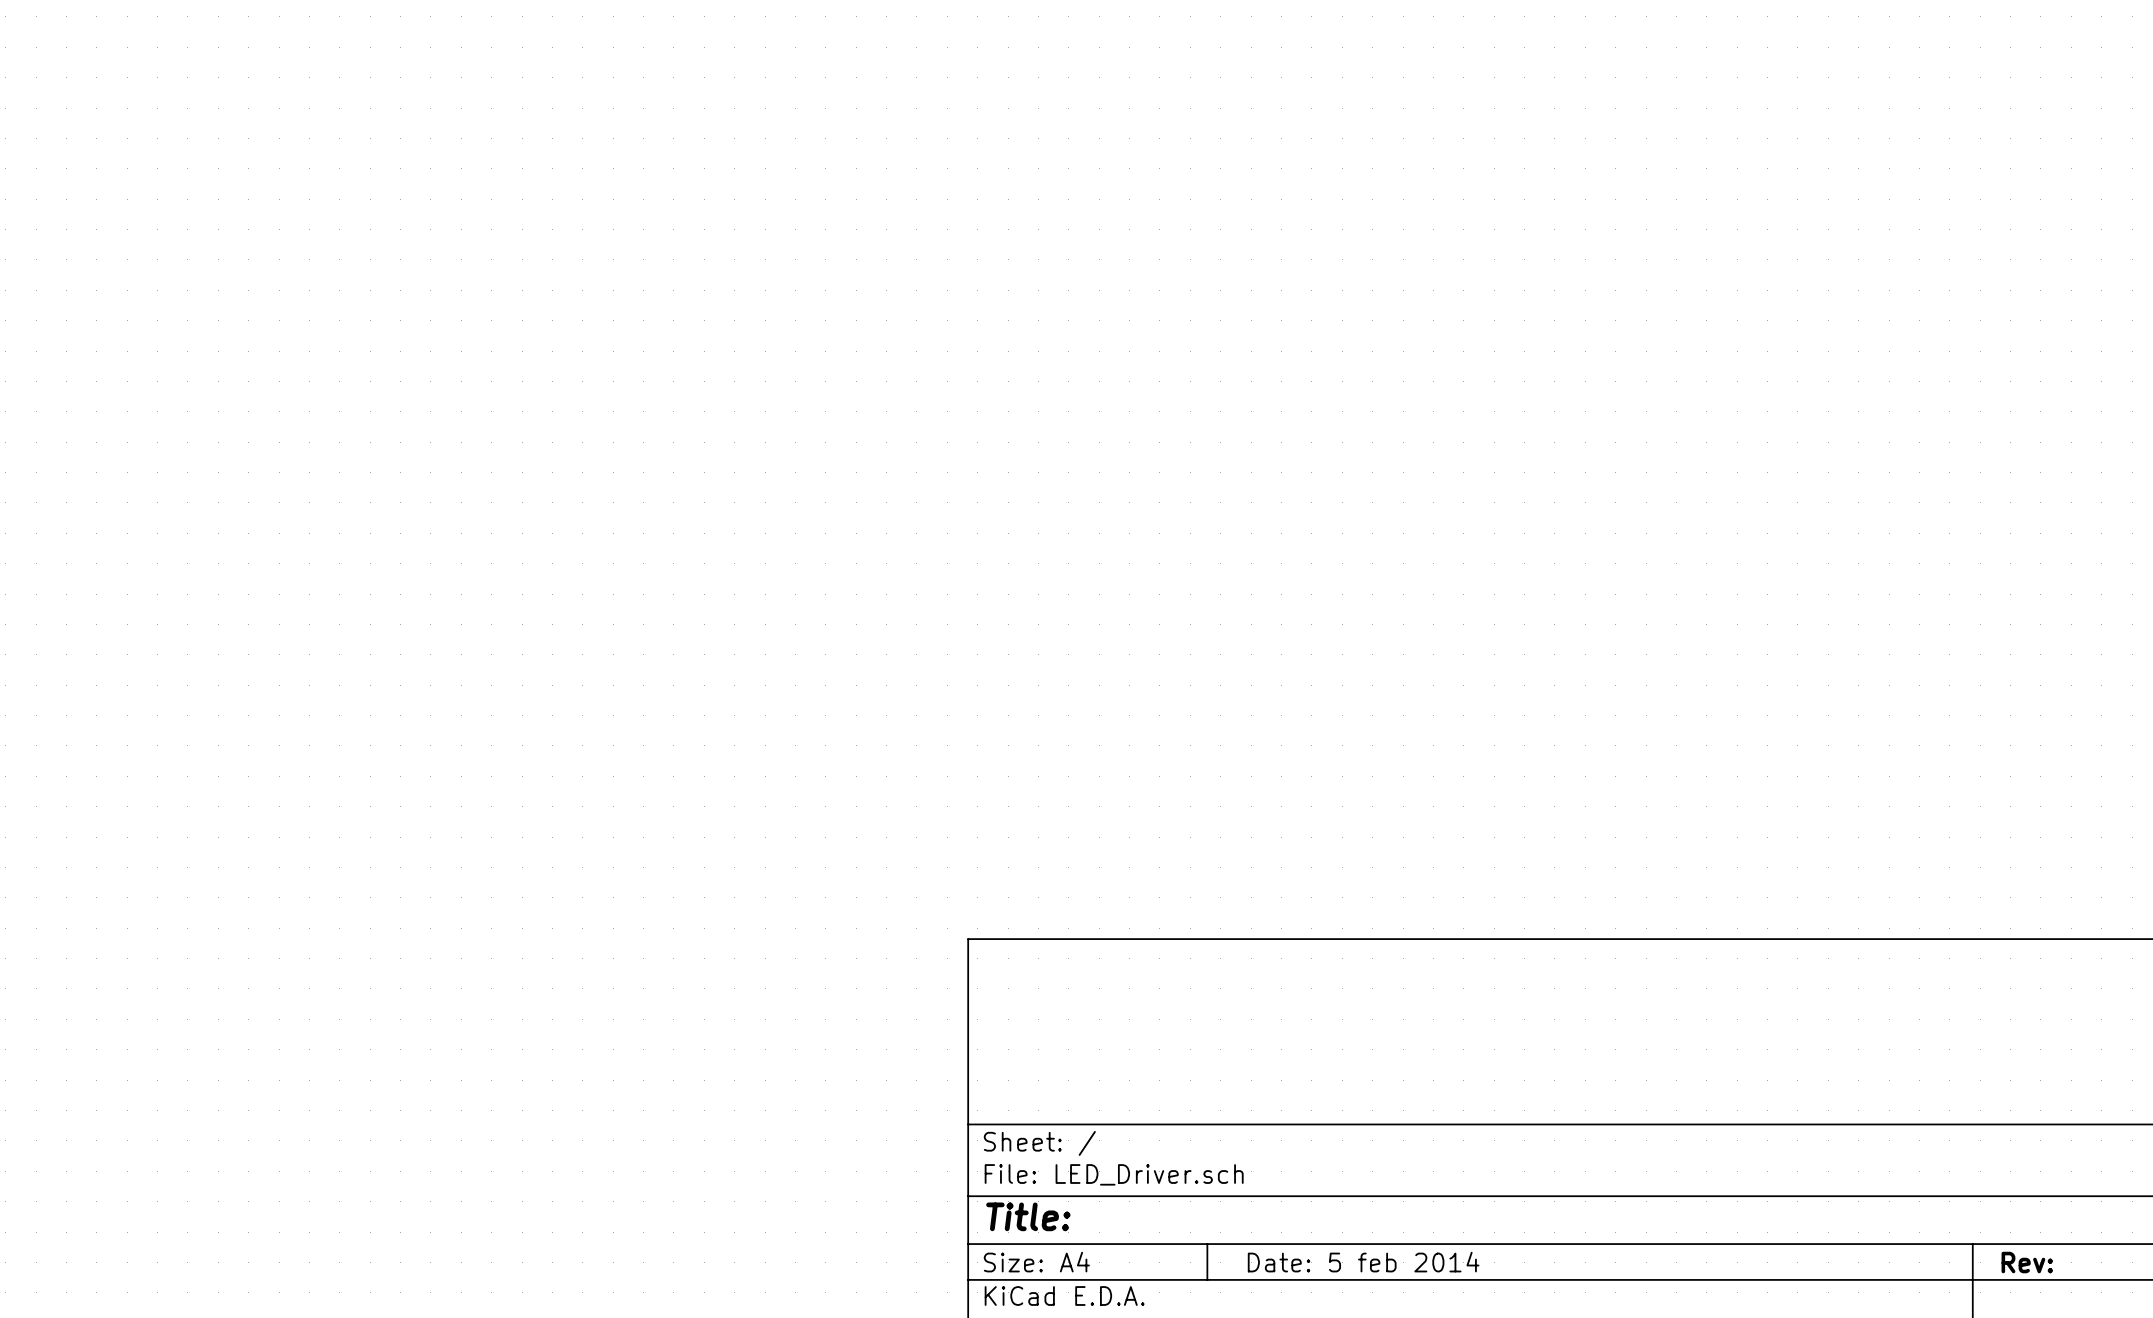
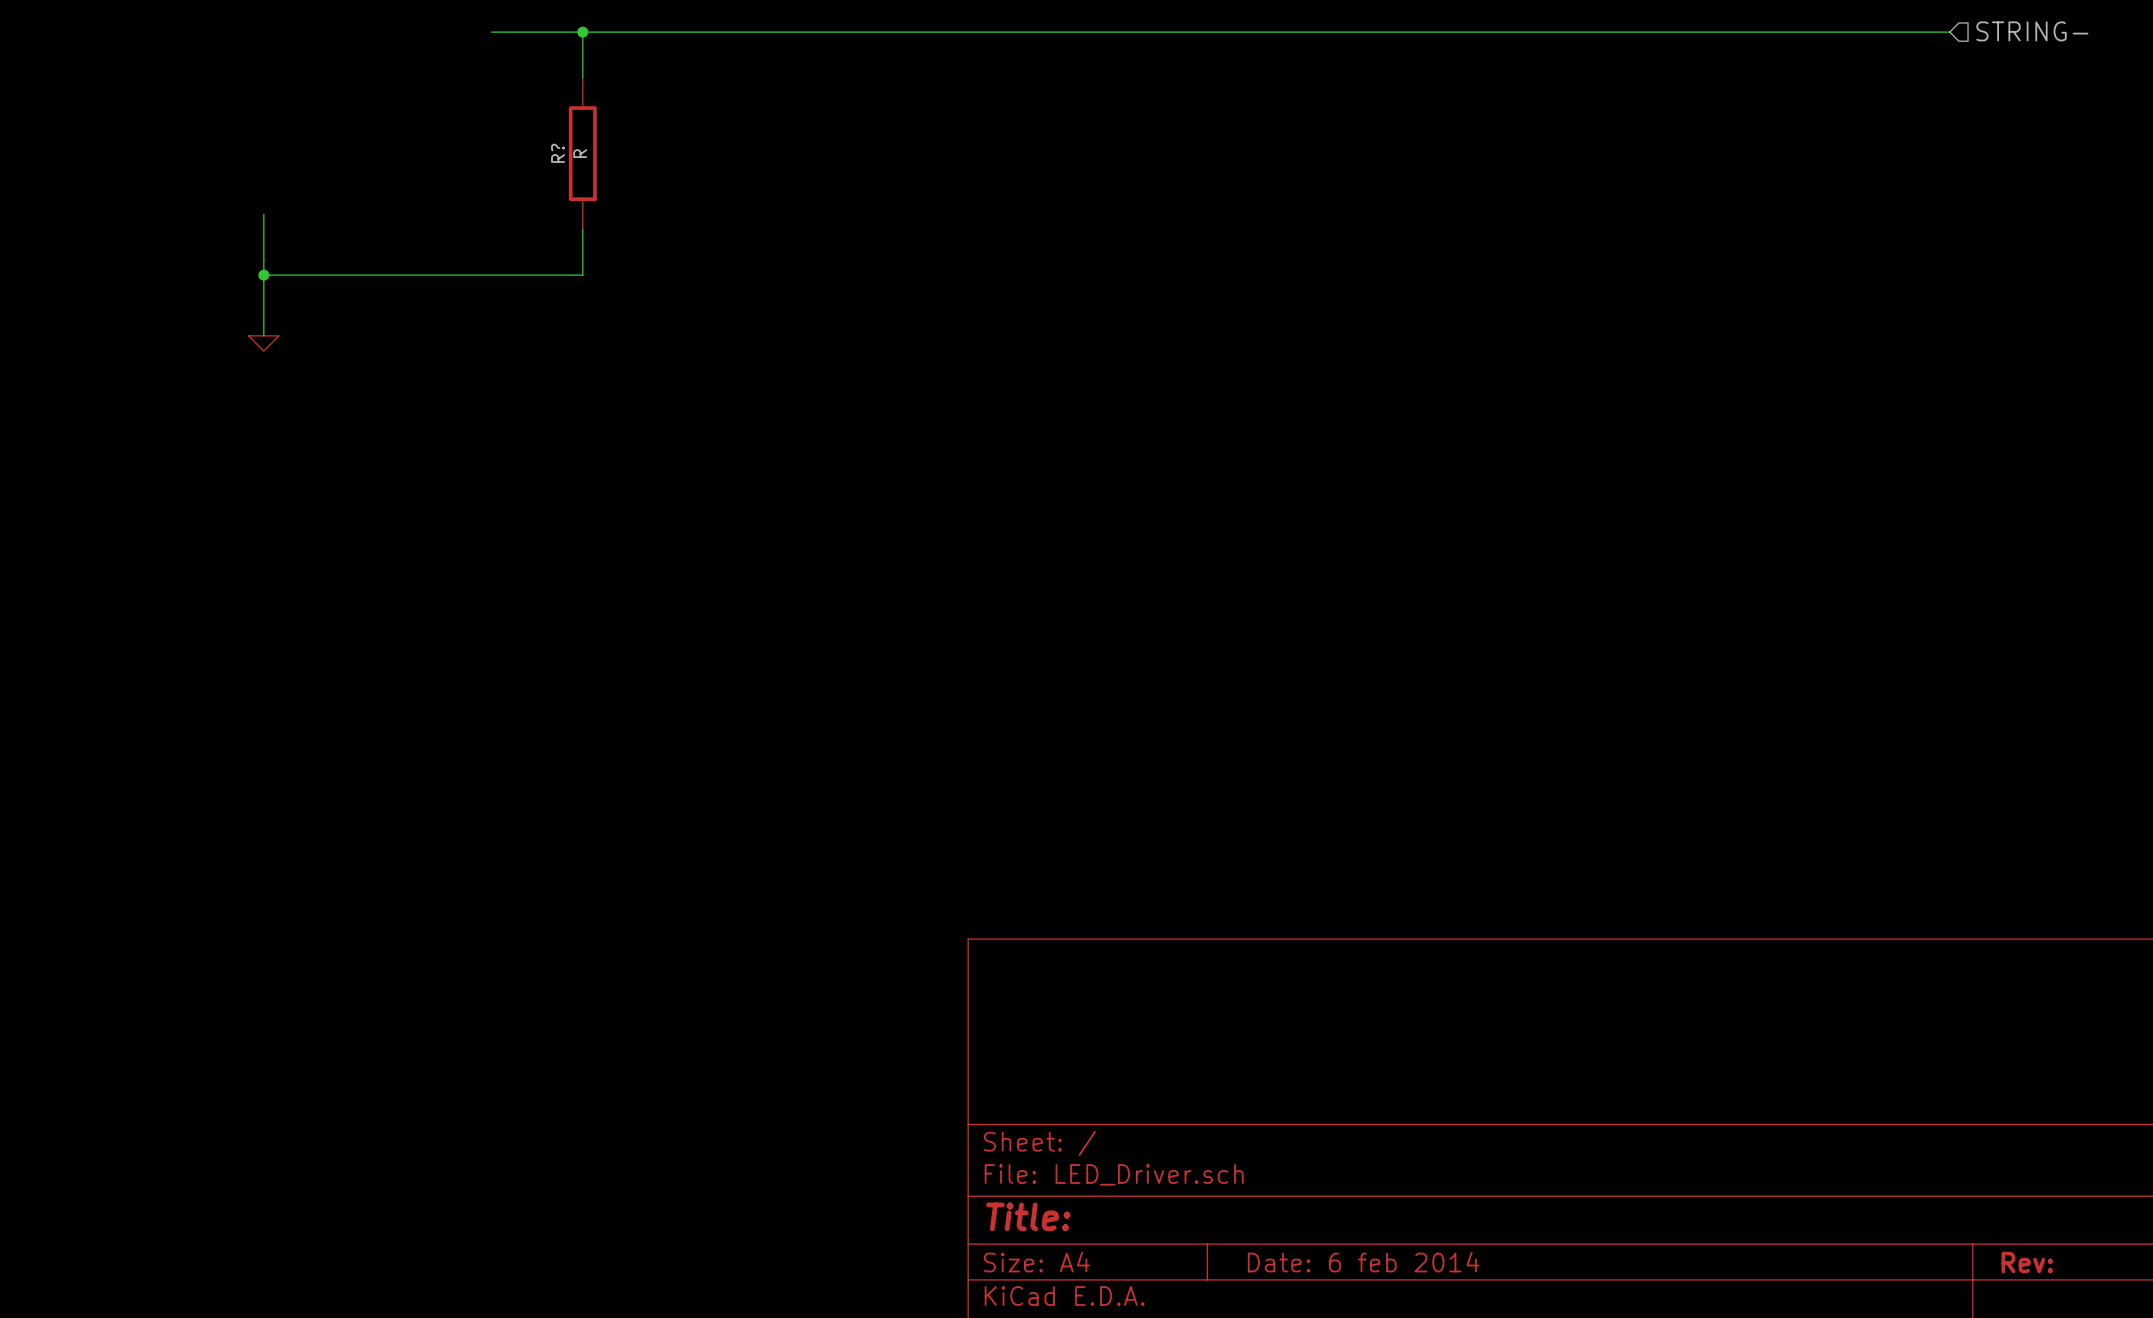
hierarchical label: none -> STRING- (2032, 31)
wire: none -> (491, 32) (1949, 32)
wire: none -> (582, 32) (582, 77)
junction: none -> (582, 32)
R?: none -> R (582, 153)
wire: none -> (263, 214) (263, 335)
wire: none -> (582, 229) (582, 275) (263, 275)
junction: none -> (263, 275)
power symbol: none -> (263, 343)
title block: Date: 5 feb 2014 (1363, 1262) -> Date: 6 feb 2014 (1363, 1262)

